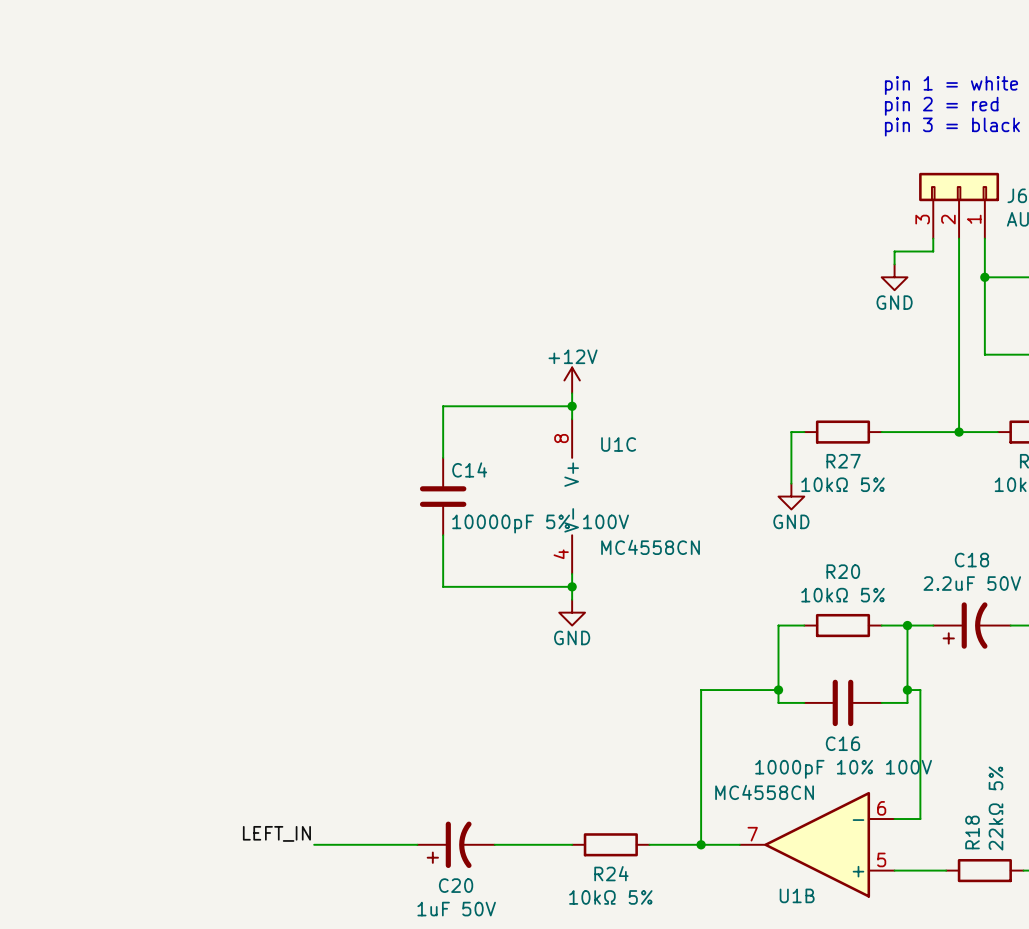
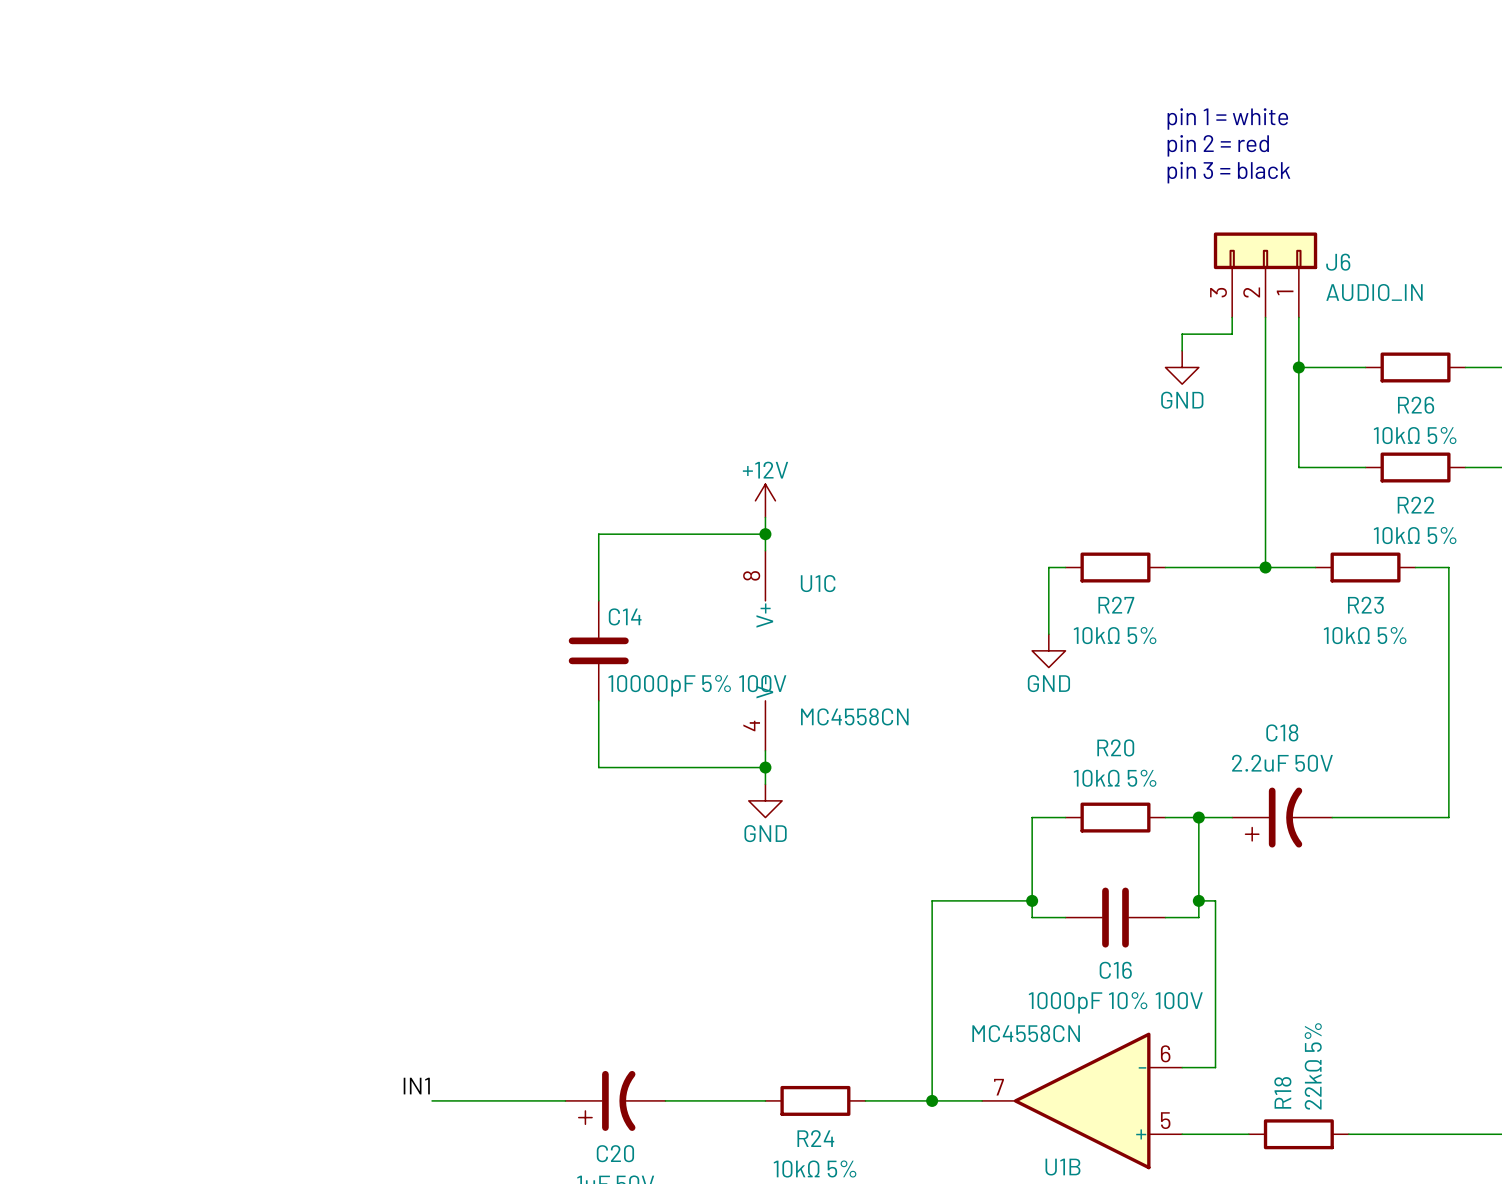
label: LEFT_IN (276, 833) -> IN1 (416, 1086)

